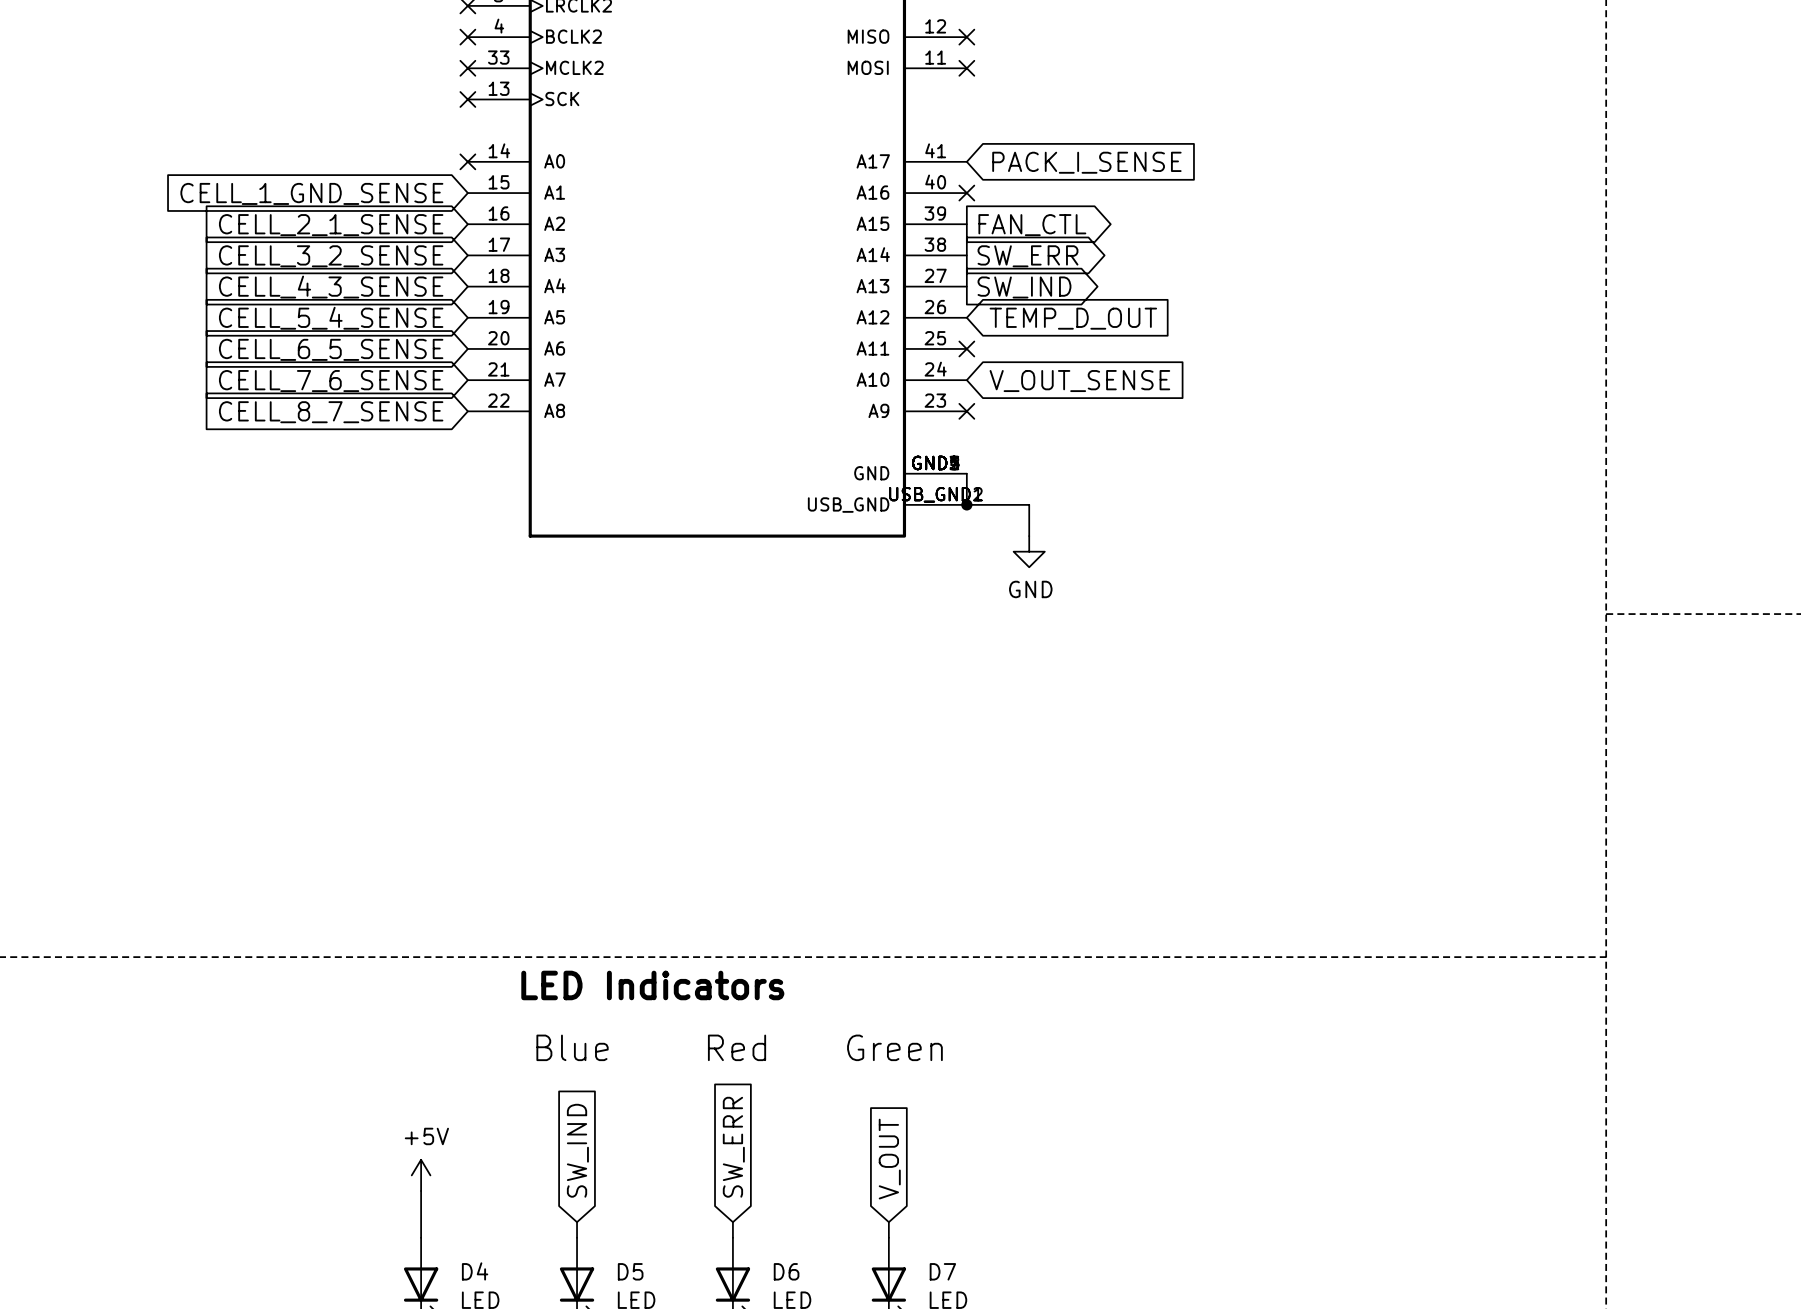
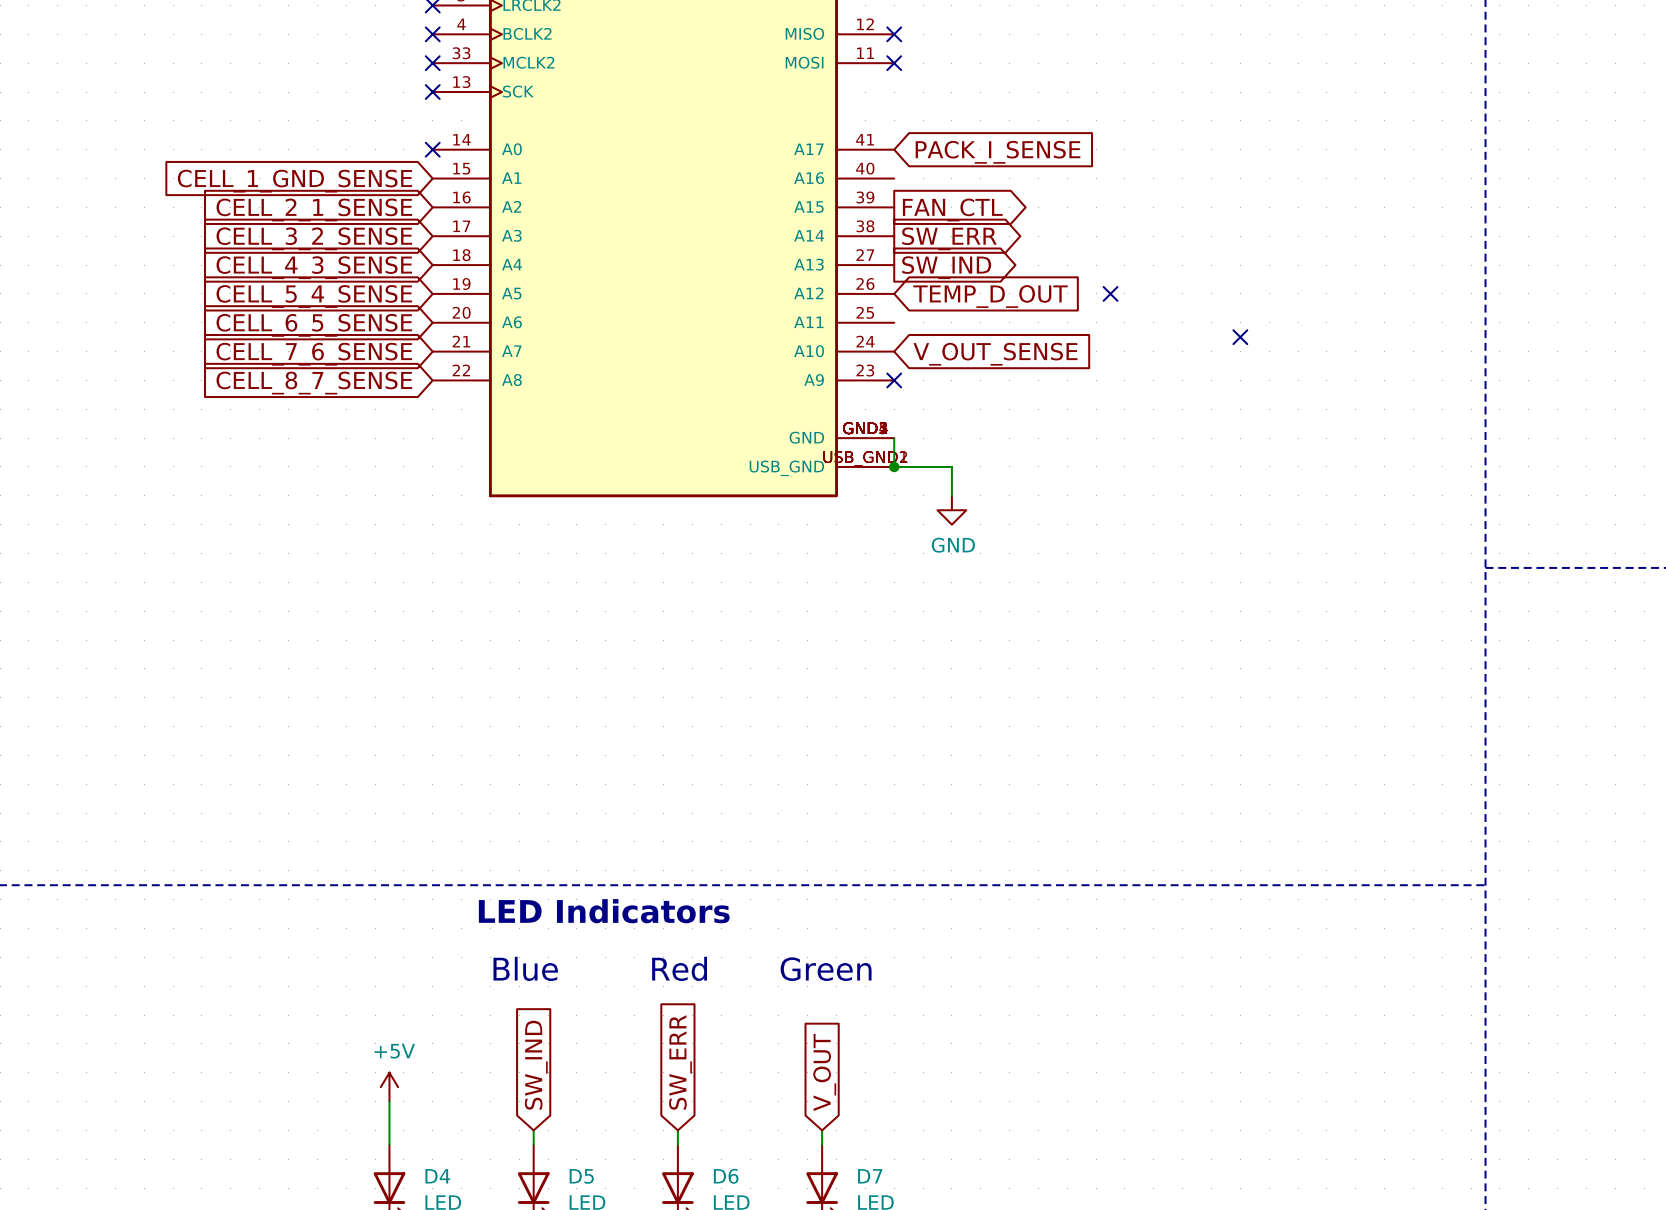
no-connect mark: (966, 193) -> none
no-connect mark: none -> (1110, 293)
no-connect mark: (966, 348) -> none
no-connect mark: none -> (1240, 337)

